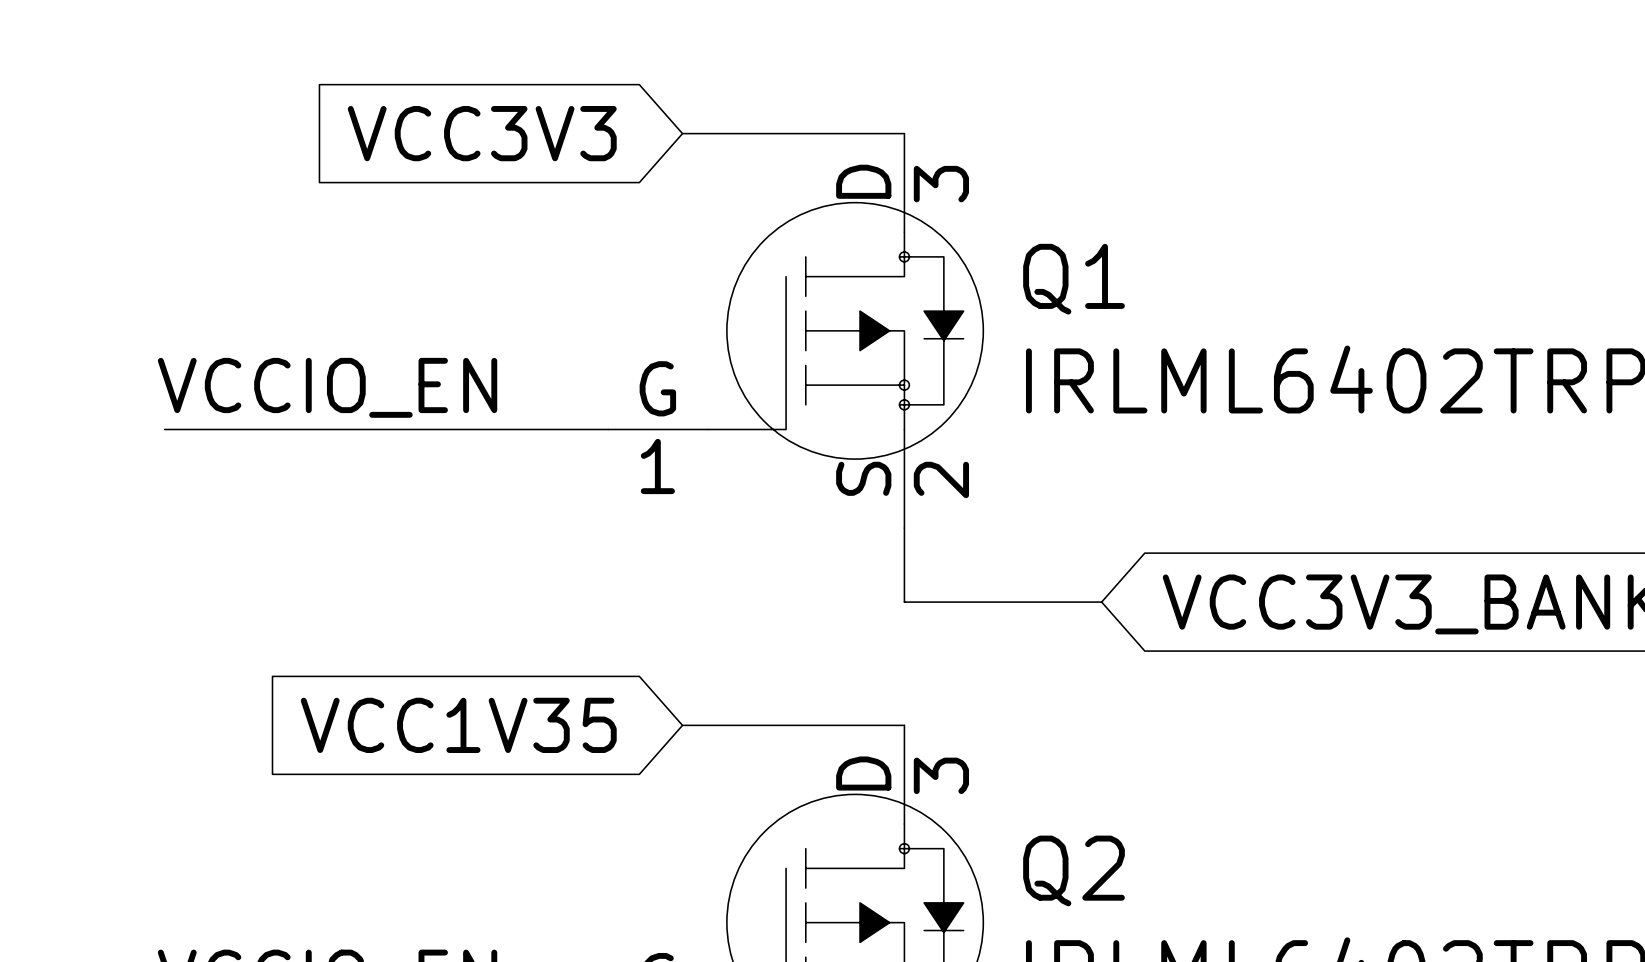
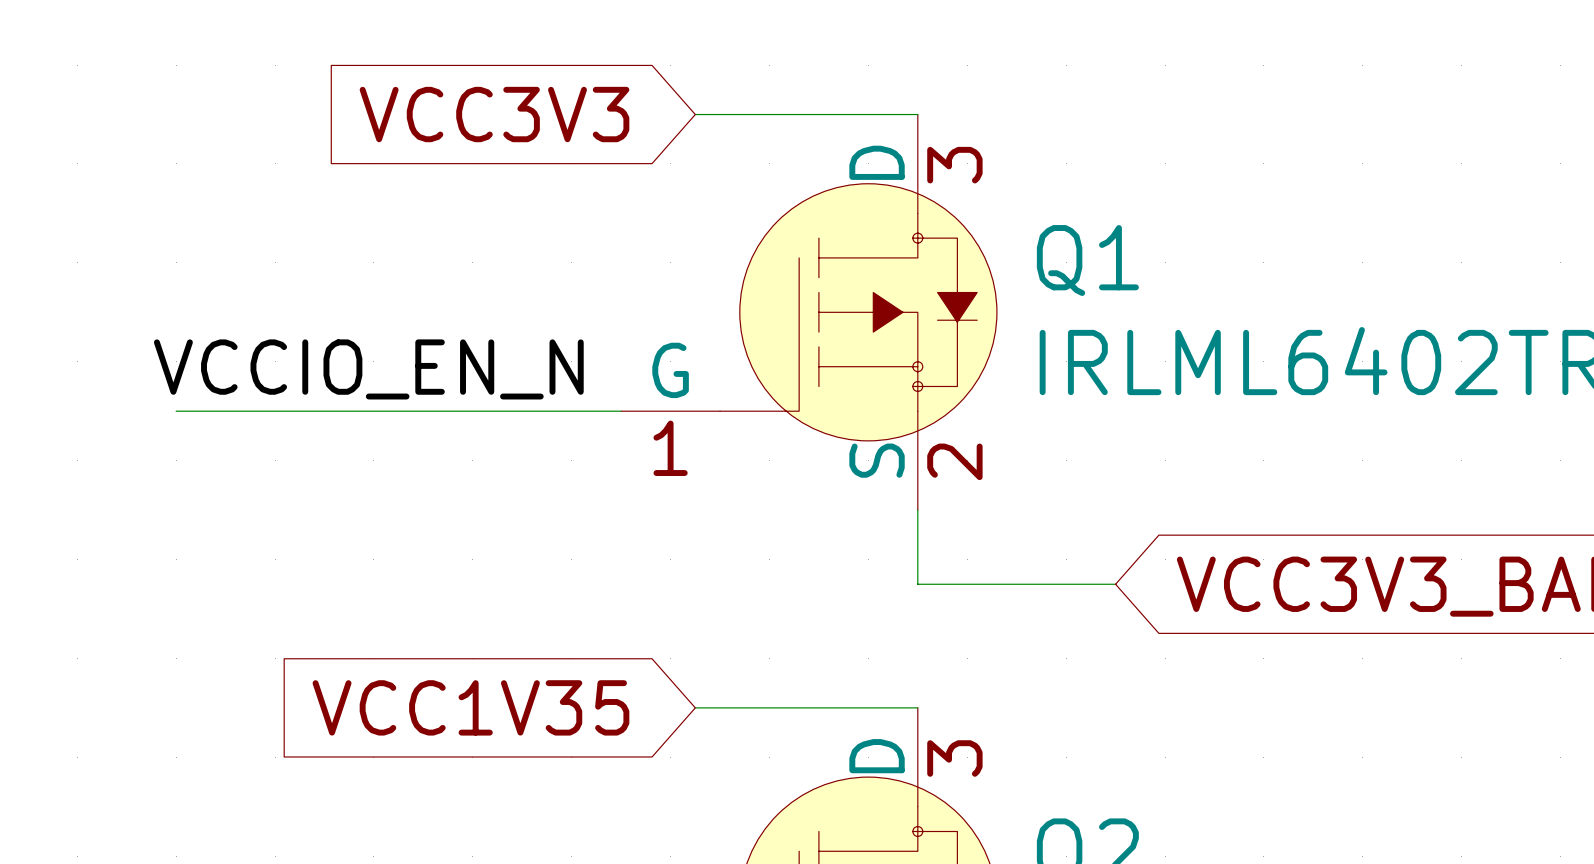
label: VCCIO_EN (327, 387) -> VCCIO_EN_N (368, 369)

